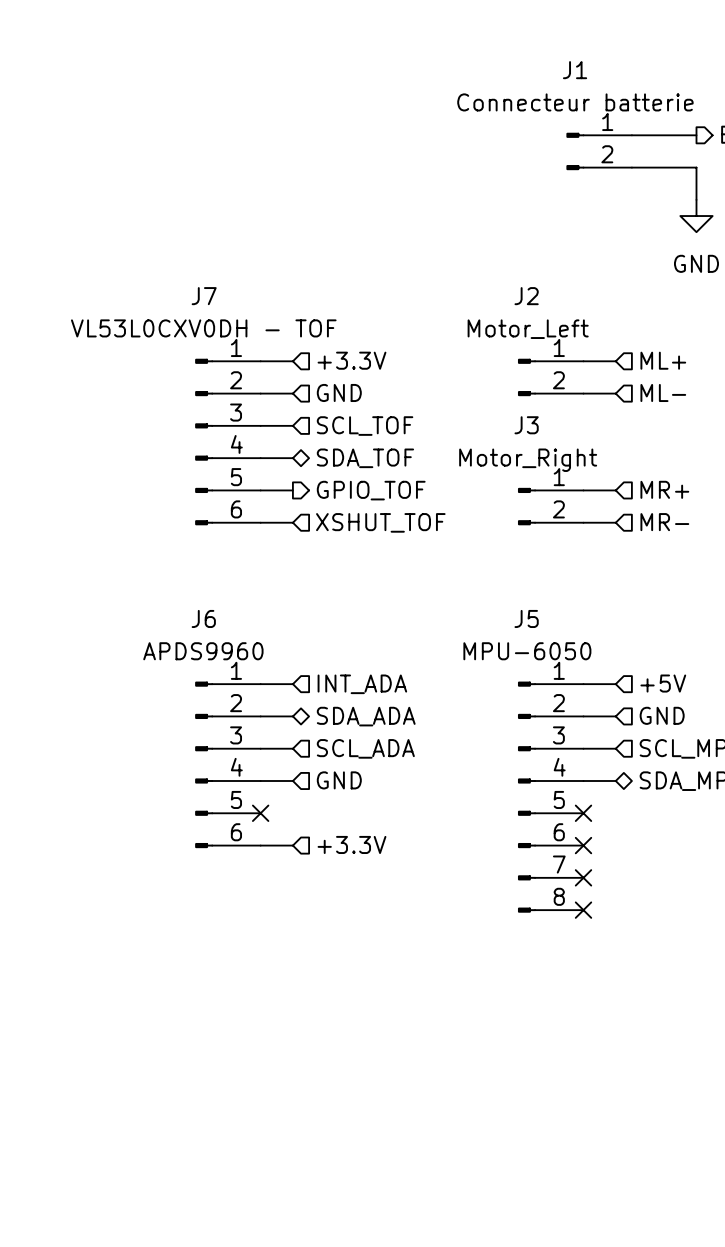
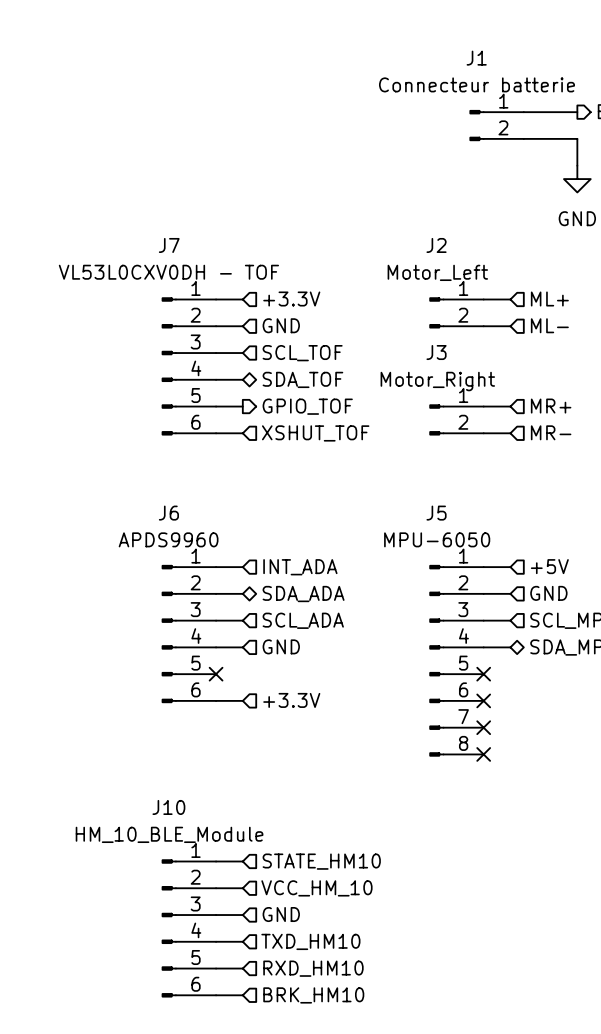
wire: none -> (216, 861) (242, 861)
hierarchical label: none -> STATE_HM10 (321, 861)
wire: none -> (216, 888) (242, 888)
hierarchical label: none -> VCC_HM_10 (316, 888)
wire: none -> (216, 915) (242, 915)
hierarchical label: none -> GND (281, 914)
J10: none -> HM_10_BLE_Module (188, 928)
wire: none -> (216, 941) (242, 941)
hierarchical label: none -> TXD_HM10 (310, 941)
wire: none -> (216, 968) (242, 968)
hierarchical label: none -> RXD_HM10 (313, 968)
wire: none -> (216, 995) (242, 995)
hierarchical label: none -> BRK_HM10 (313, 995)

